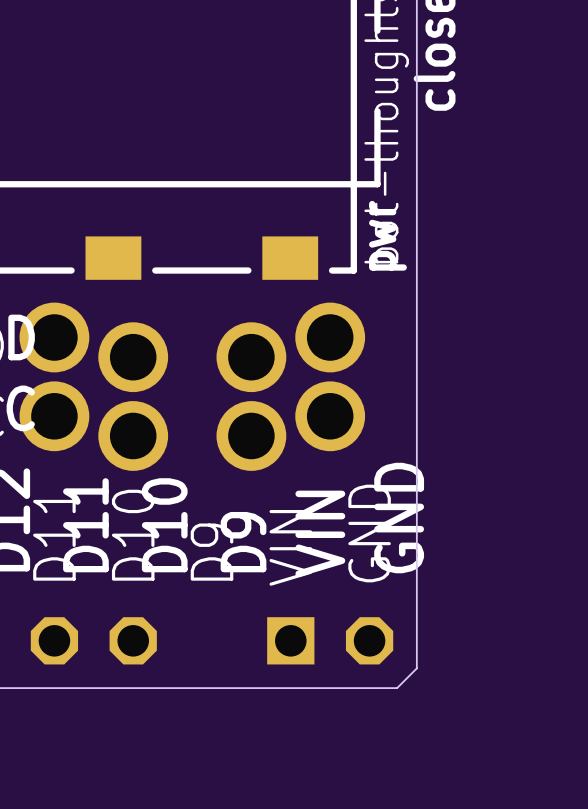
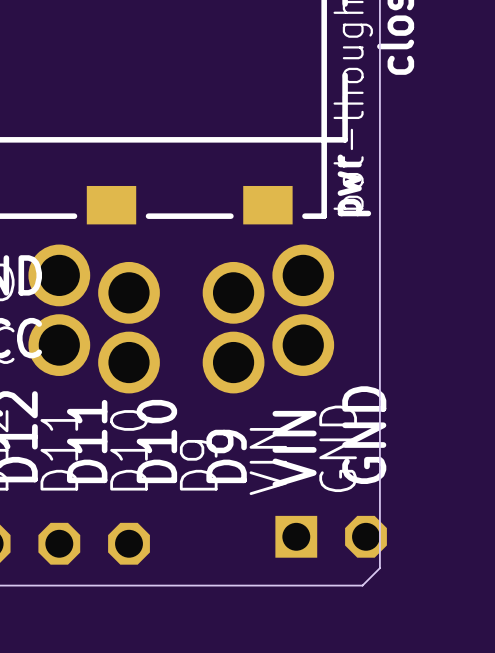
part position: (330, 640) -> (331, 536)

